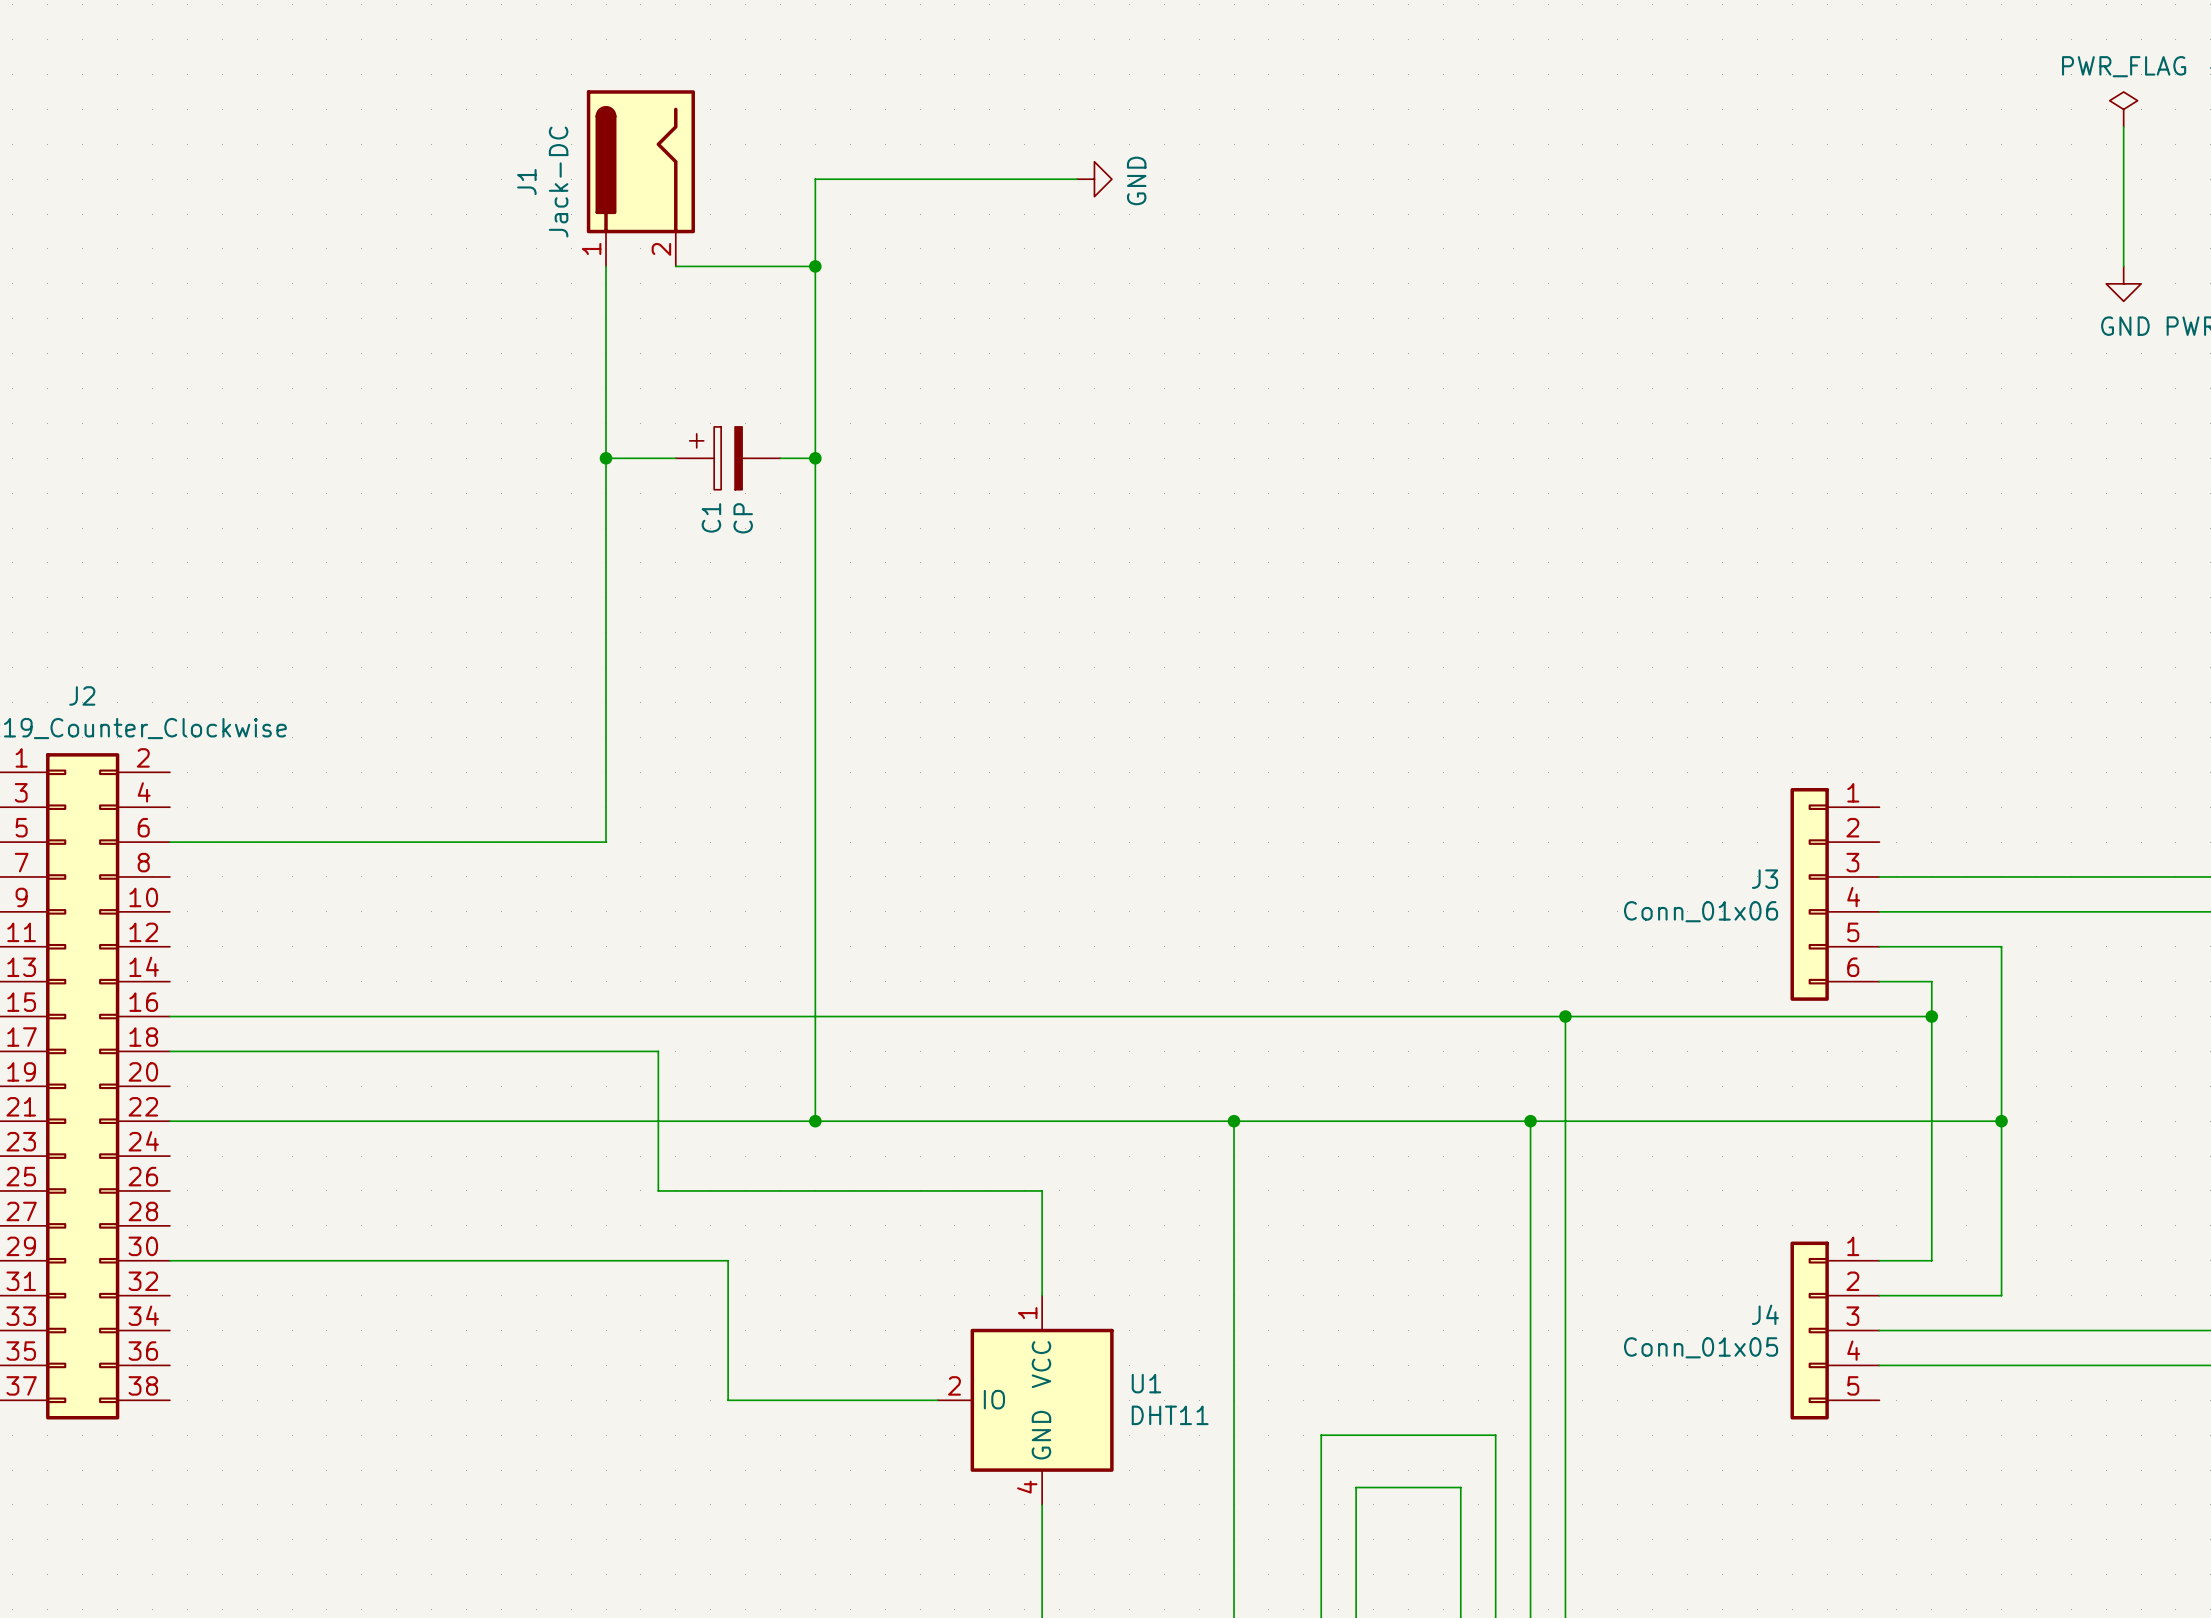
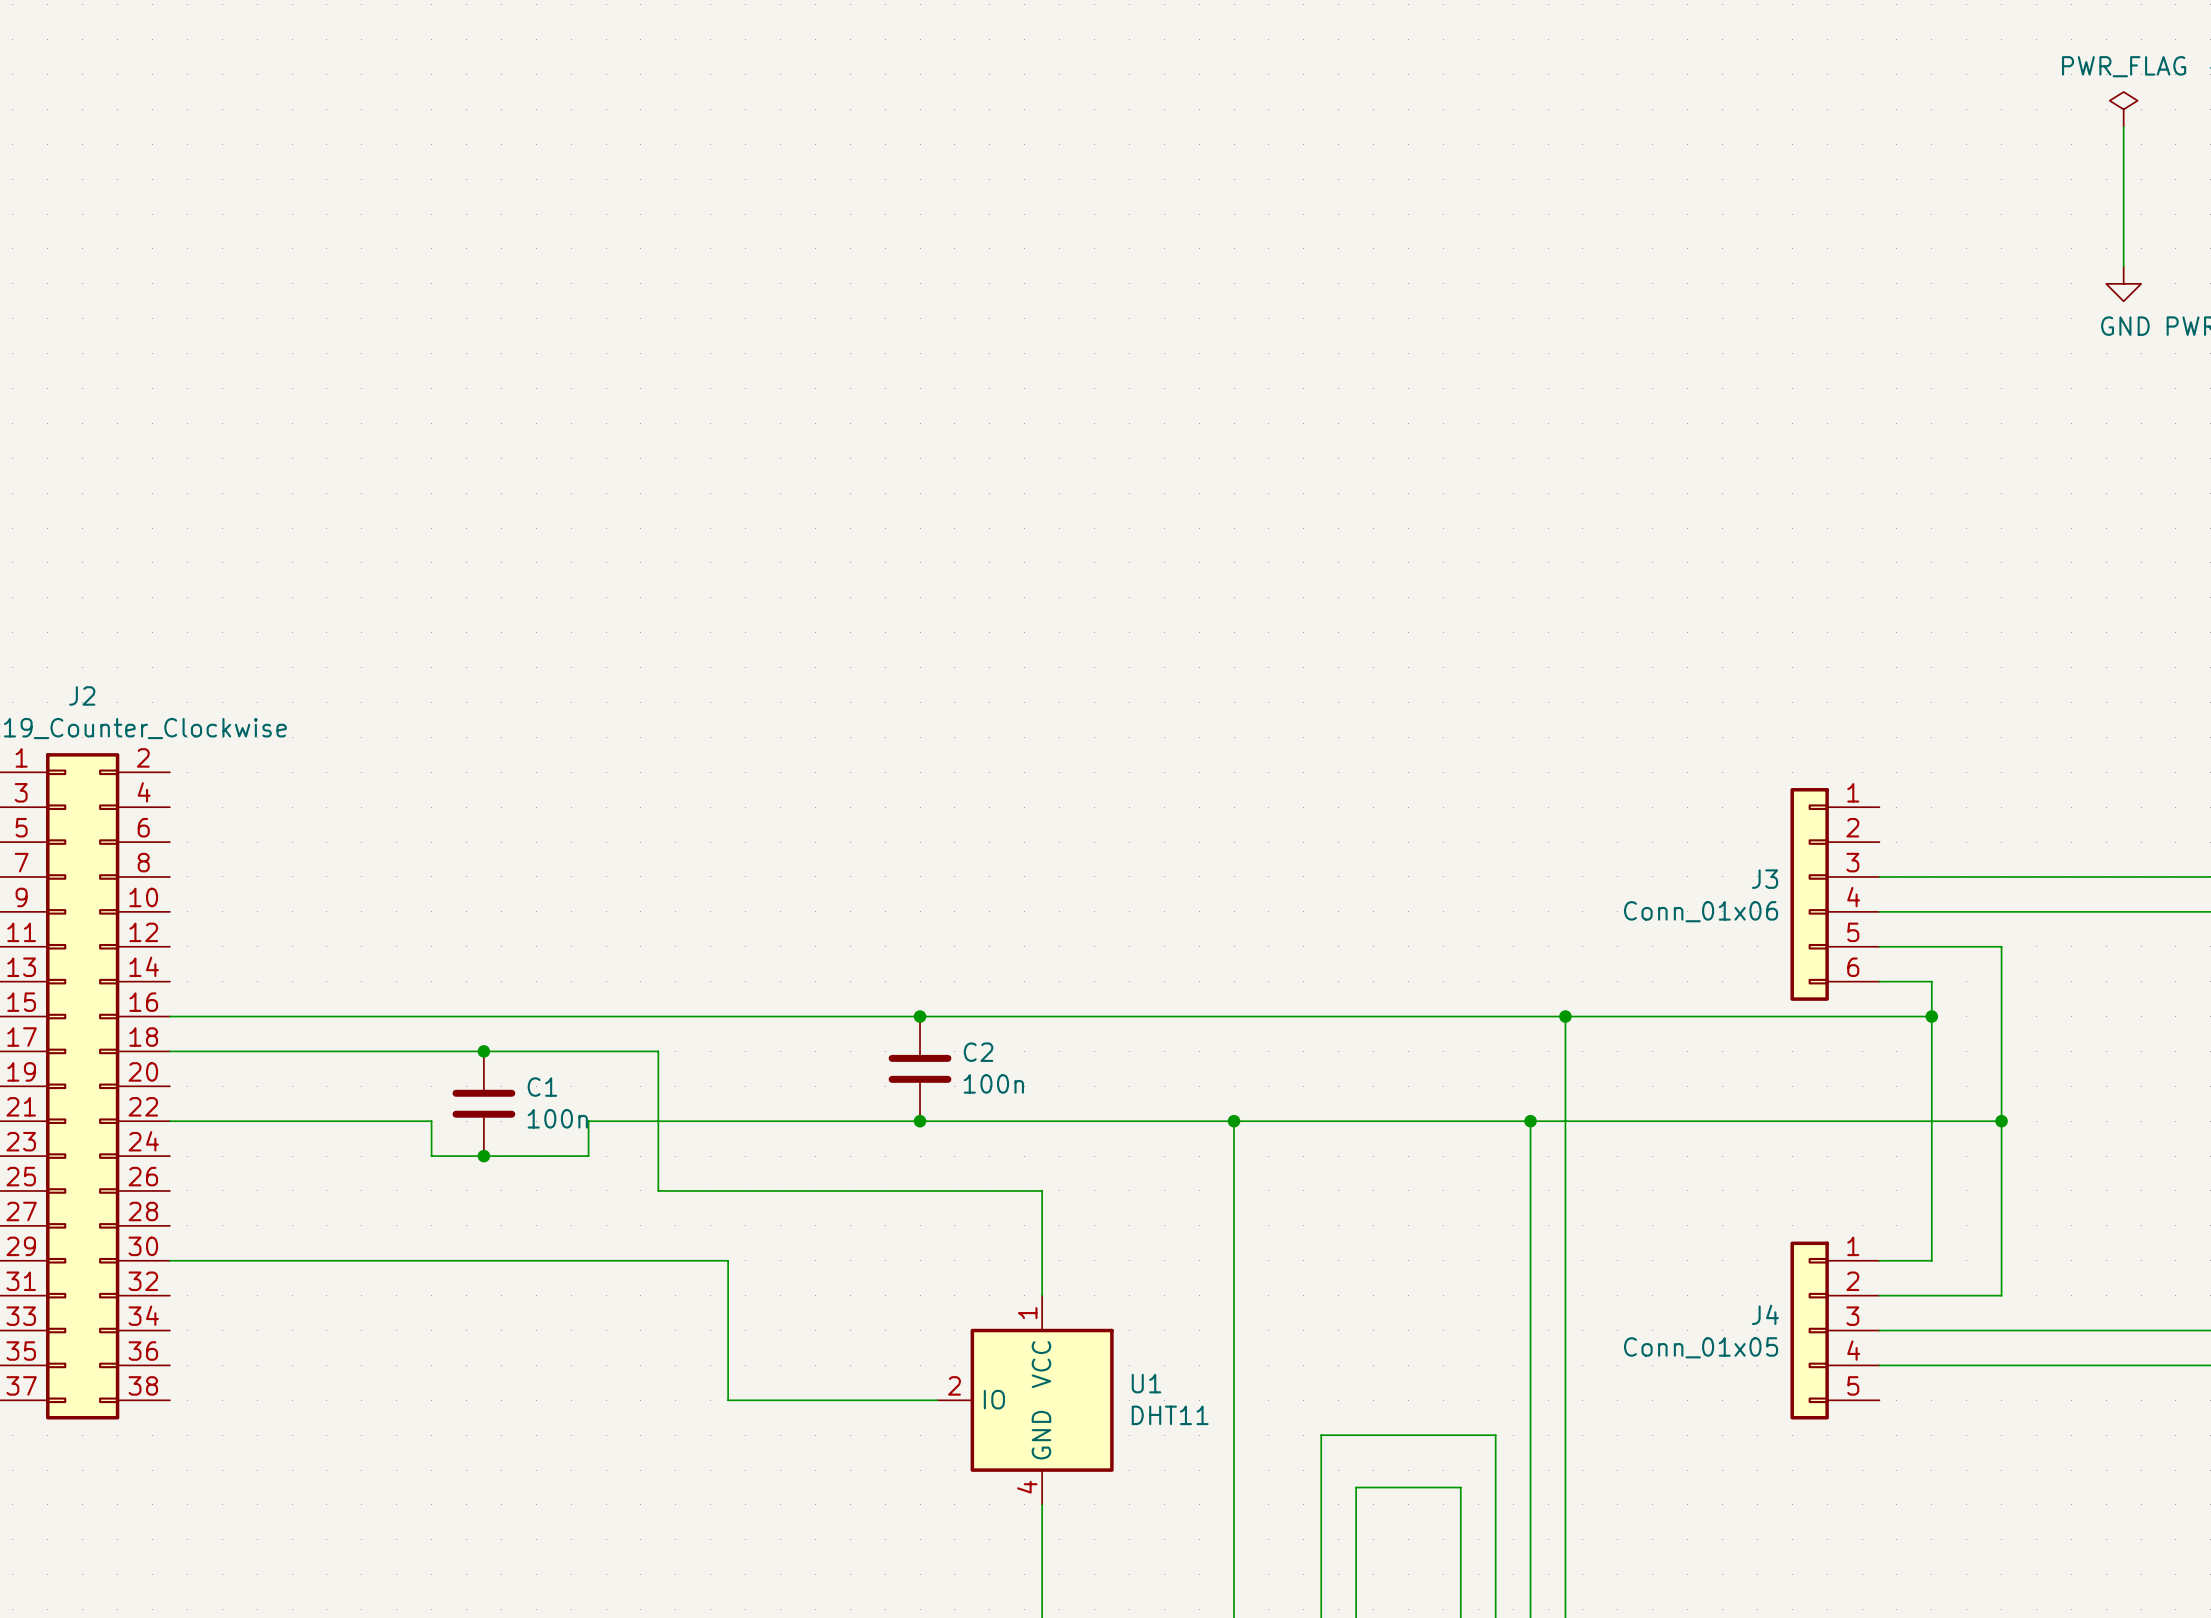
J1: Jack-DC (640, 178) -> none
wire: (1077, 179) (815, 179) (815, 1121) -> none
power symbol: GND (1094, 179) -> none
wire: (606, 266) (606, 842) (169, 842) -> none
wire: (675, 266) (815, 266) -> none
junction: (815, 266) -> none
C1 symbol: [675, 426, 781, 490] -> [452, 1051, 516, 1157]
wire: (606, 458) (675, 458) -> none
junction: (606, 458) -> none
wire: (780, 458) (815, 458) -> none
junction: (815, 458) -> none
C1 name position: C1 (711, 517) -> C1 (542, 1087)
C1 value: CP (743, 518) -> 100n (557, 1118)
junction: none -> (920, 1016)
junction: none -> (483, 1051)
C2: none -> 100n (920, 1068)
wire: (431, 1121) (588, 1121) -> (431, 1121) (431, 1156) (588, 1156) (588, 1121)
junction: (815, 1121) -> none
junction: none -> (920, 1121)
junction: none -> (483, 1156)

